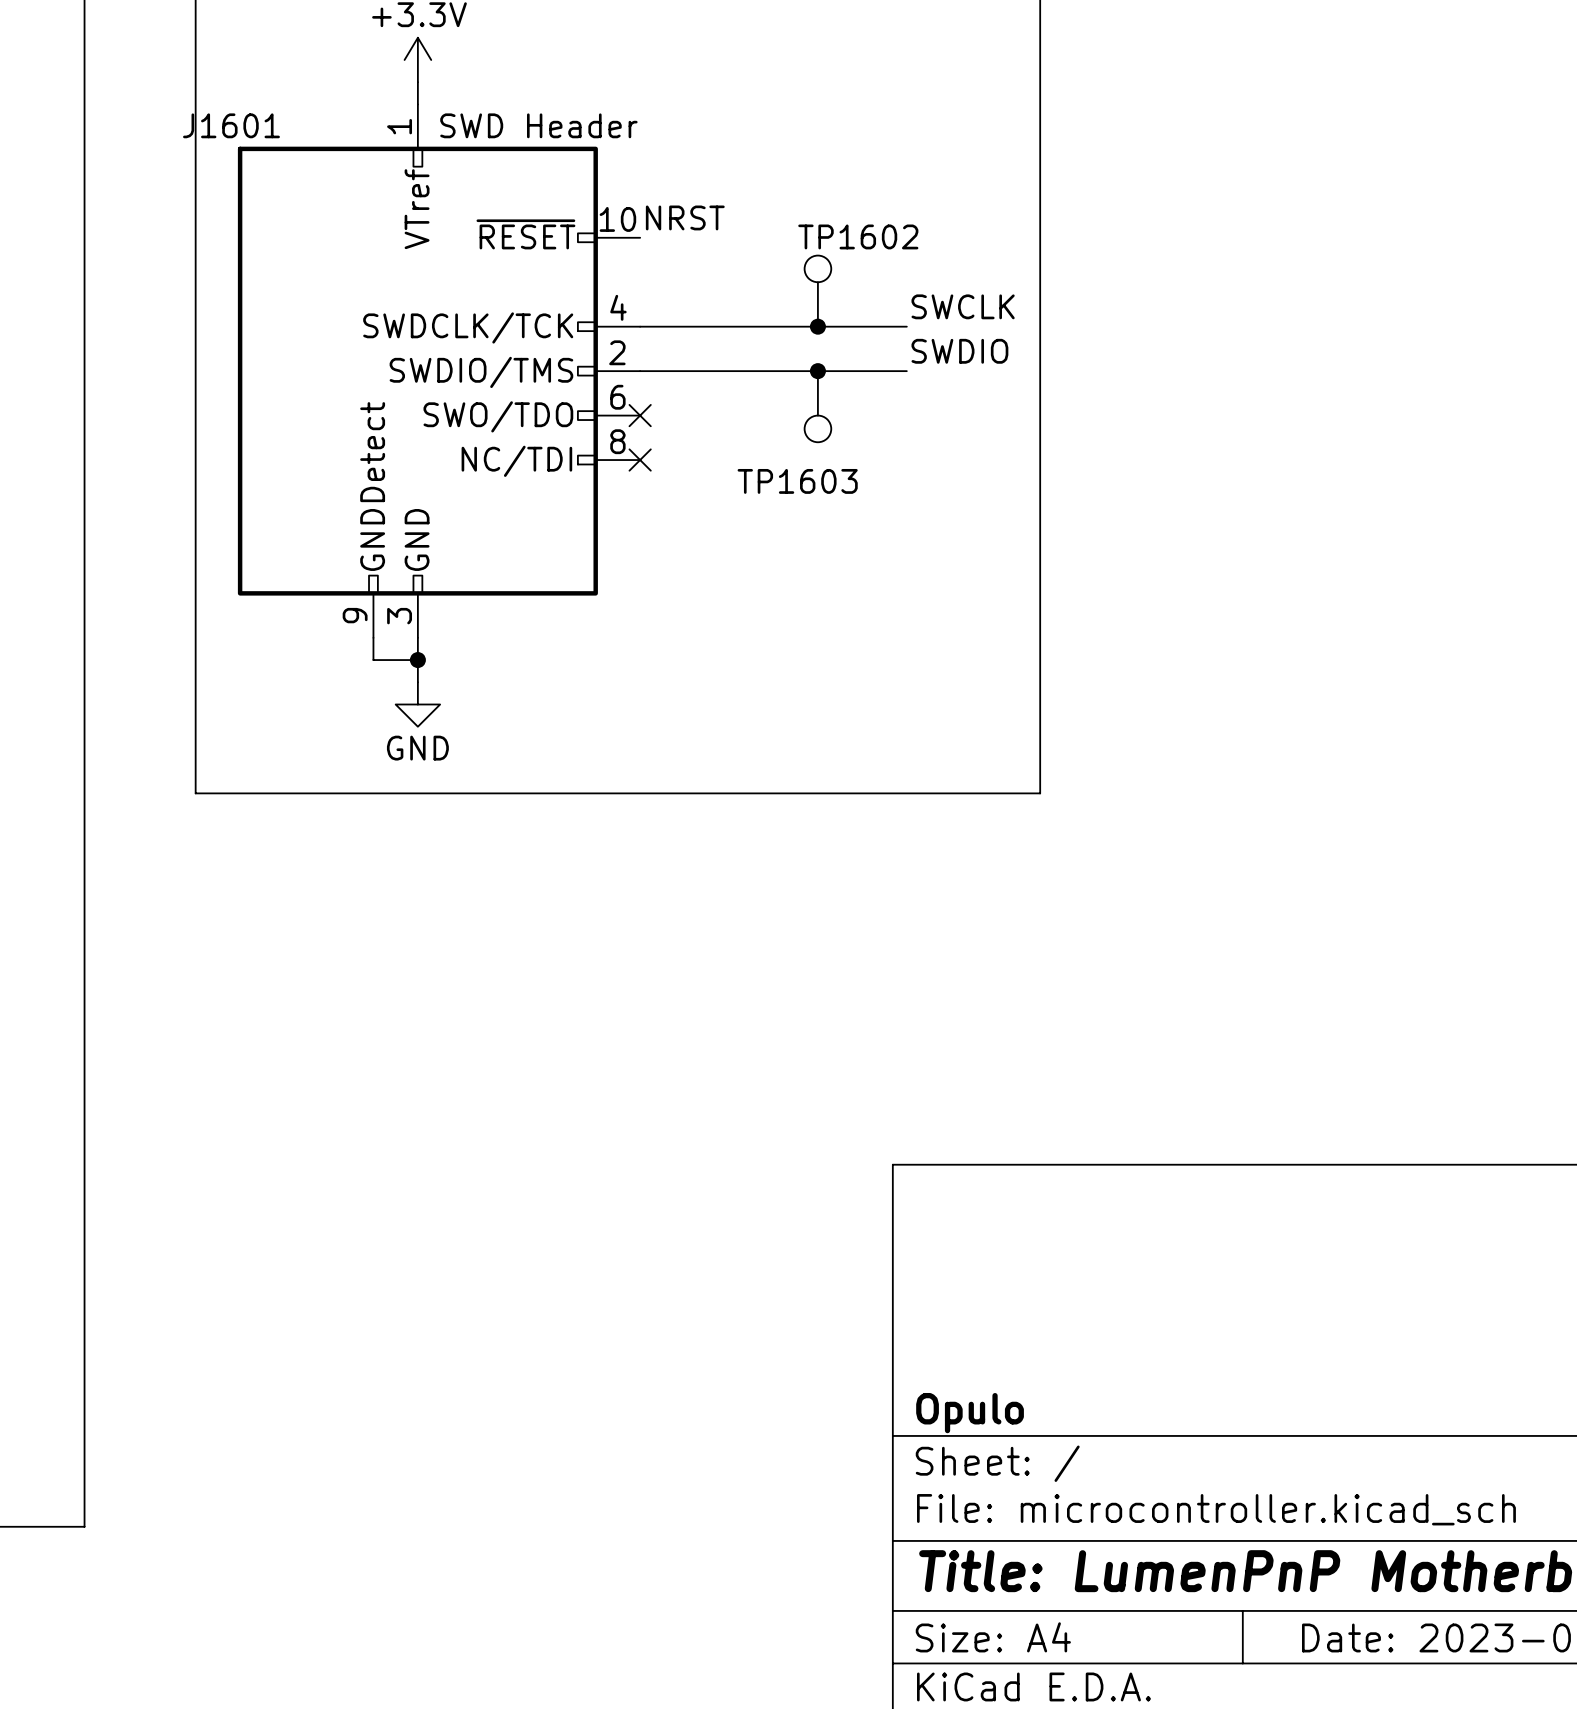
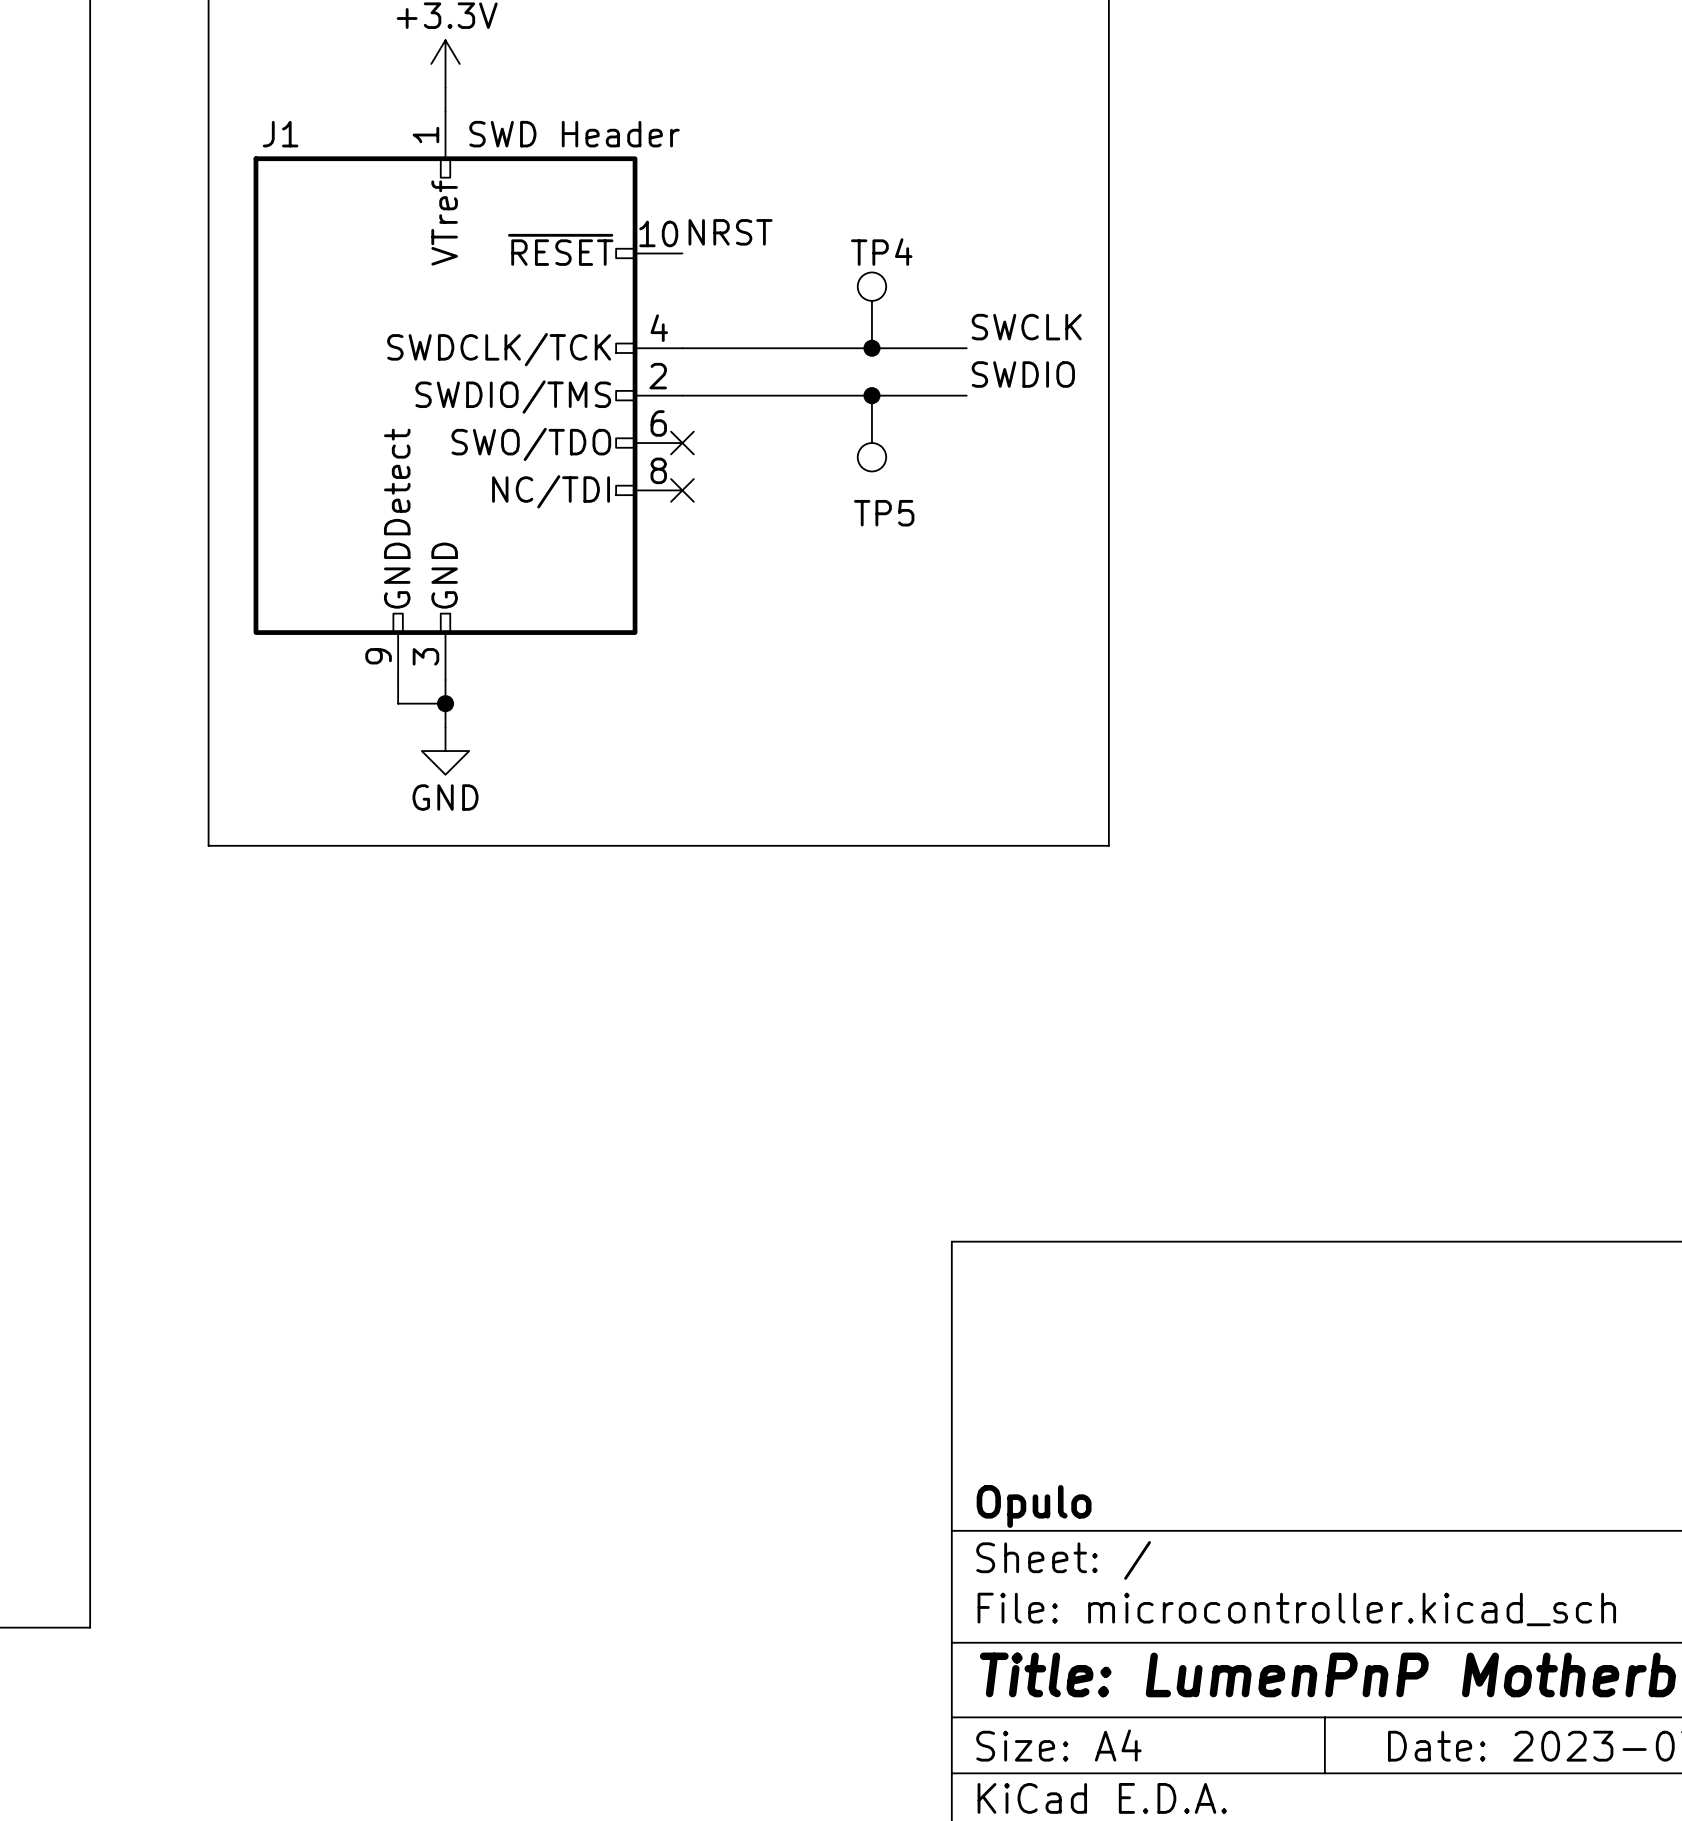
J1601 name: J1601 (231, 125) -> J1 (280, 134)
TP1602 name: TP1602 (858, 236) -> TP4 (881, 252)
TP1603 name: TP1603 (797, 481) -> TP5 (884, 513)

